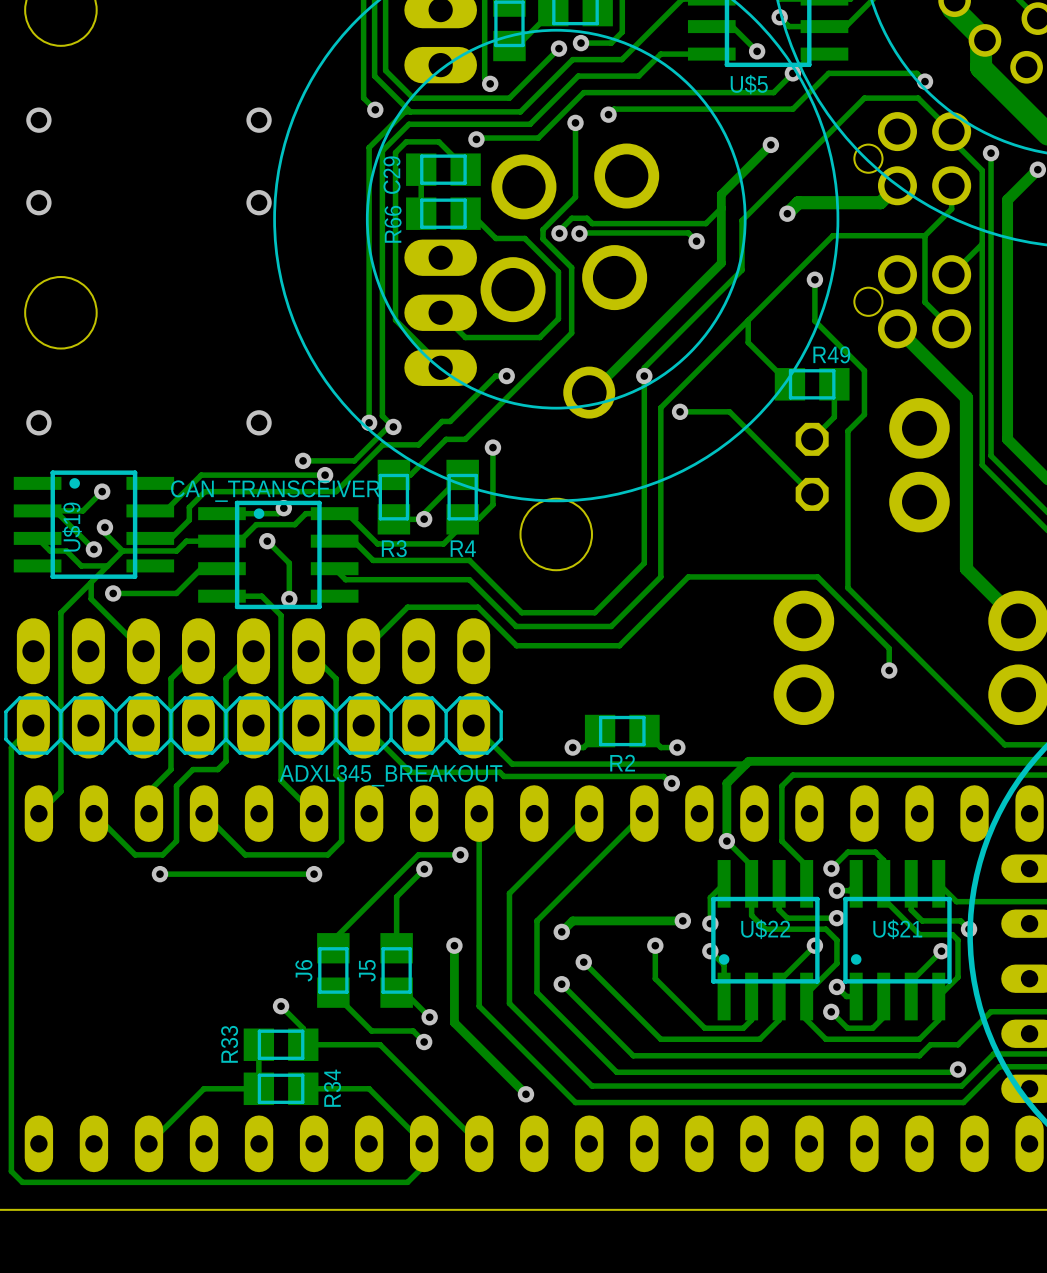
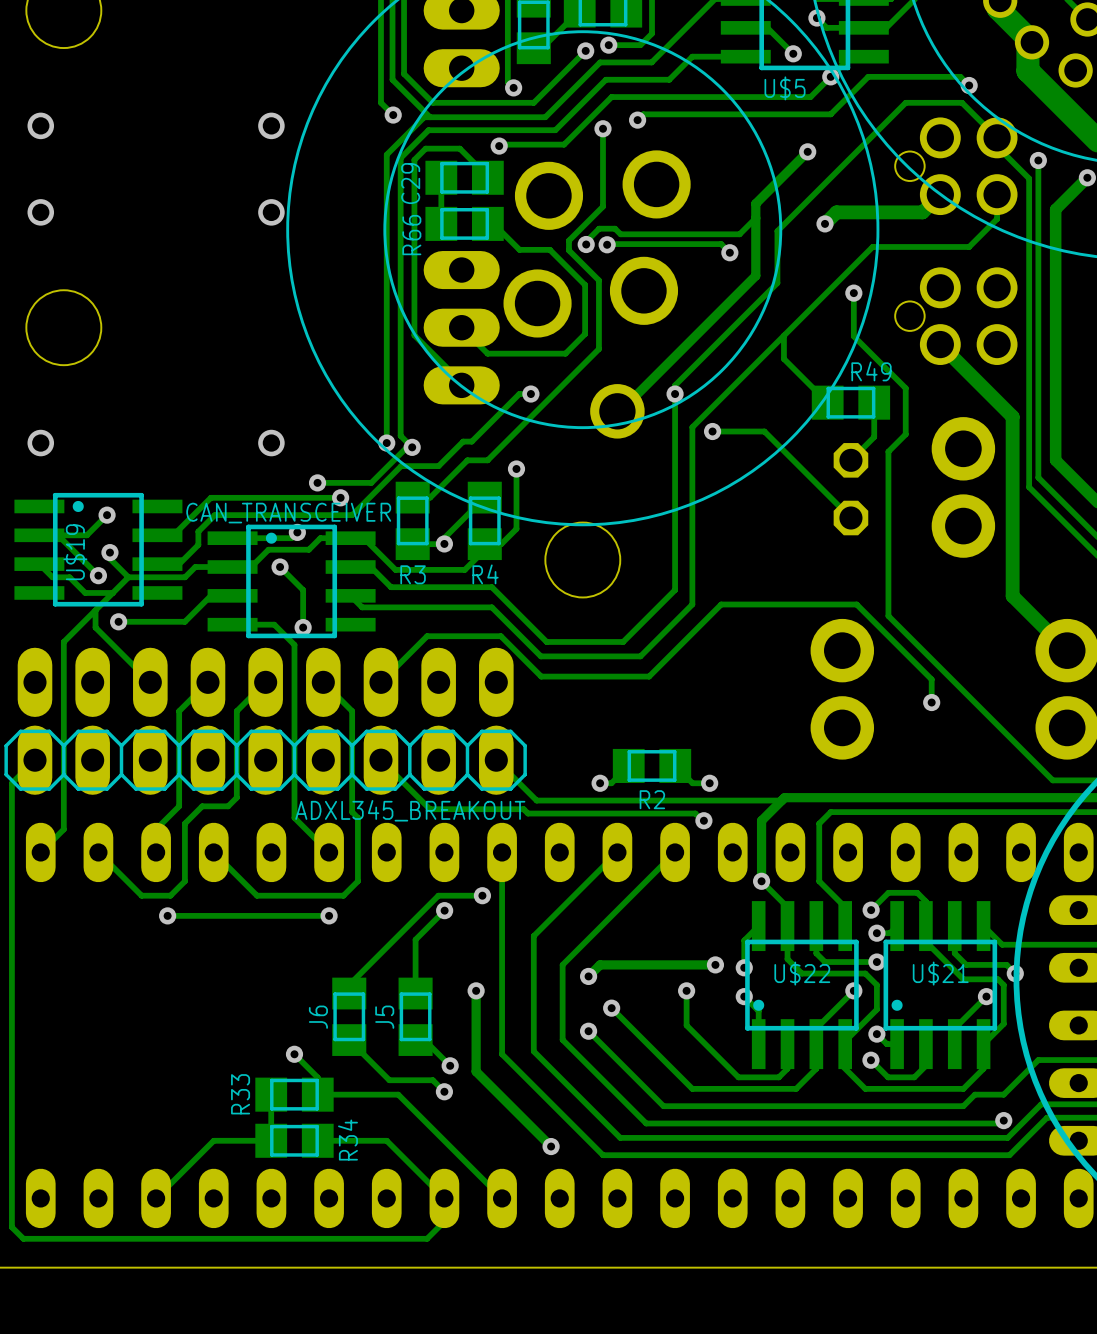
track: (924, 235) (924, 302) (951, 328) -> none
track: (982, 244) (951, 274) -> none

